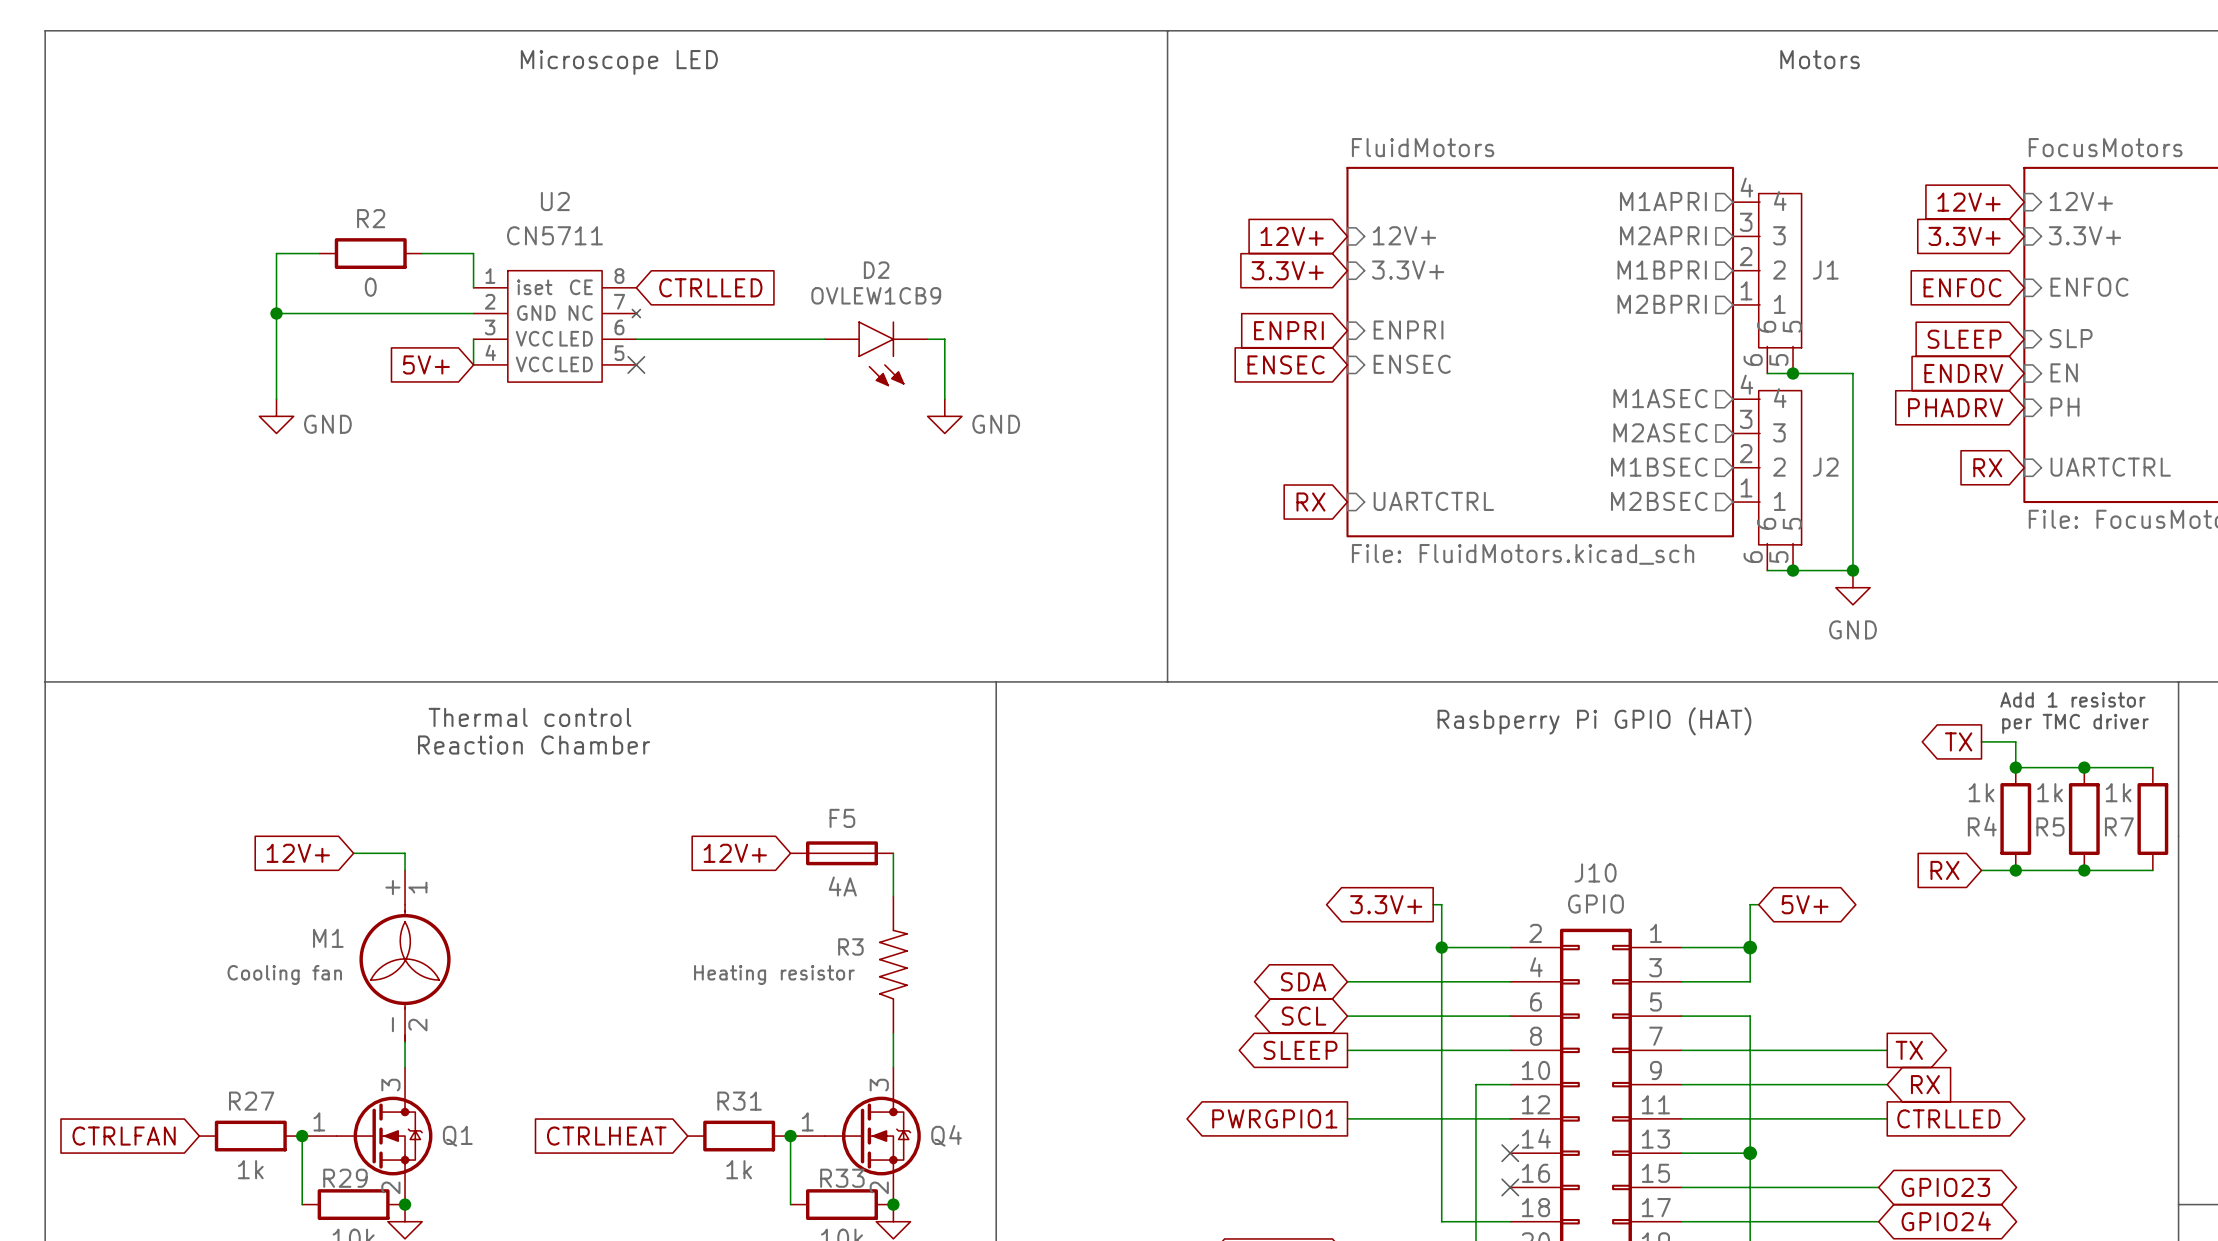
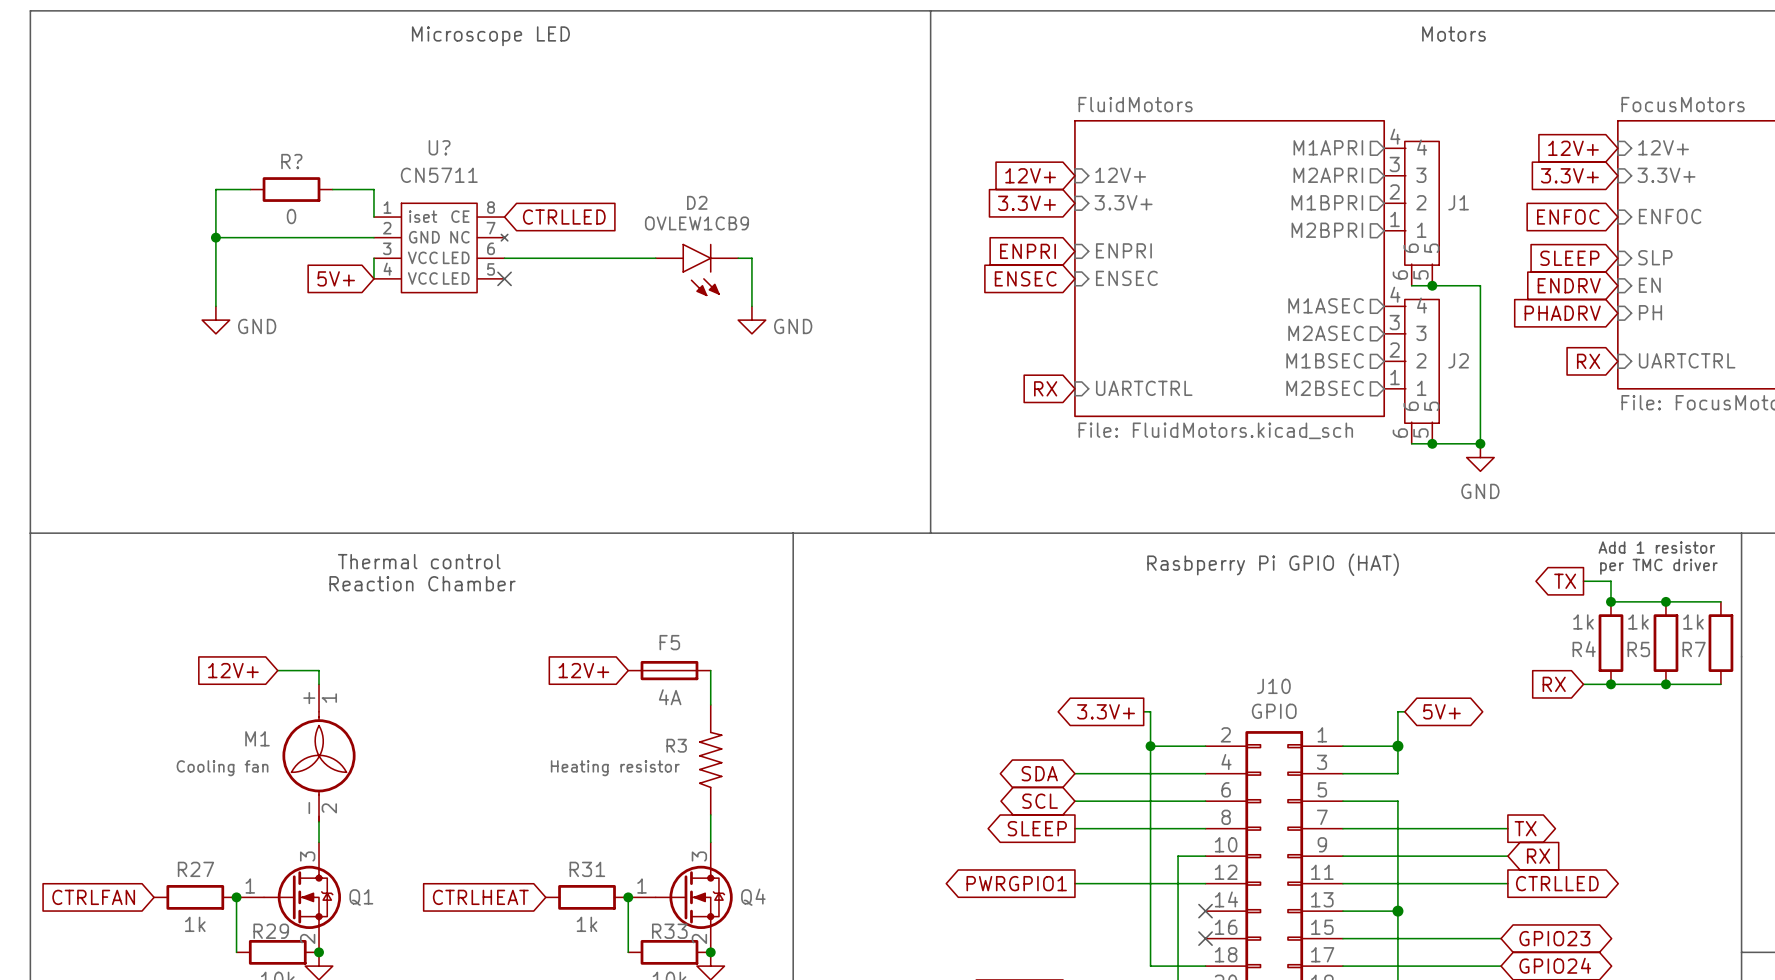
U2 name: U2 (555, 201) -> U? (439, 147)
R2 name: R2 (371, 218) -> R? (291, 161)

